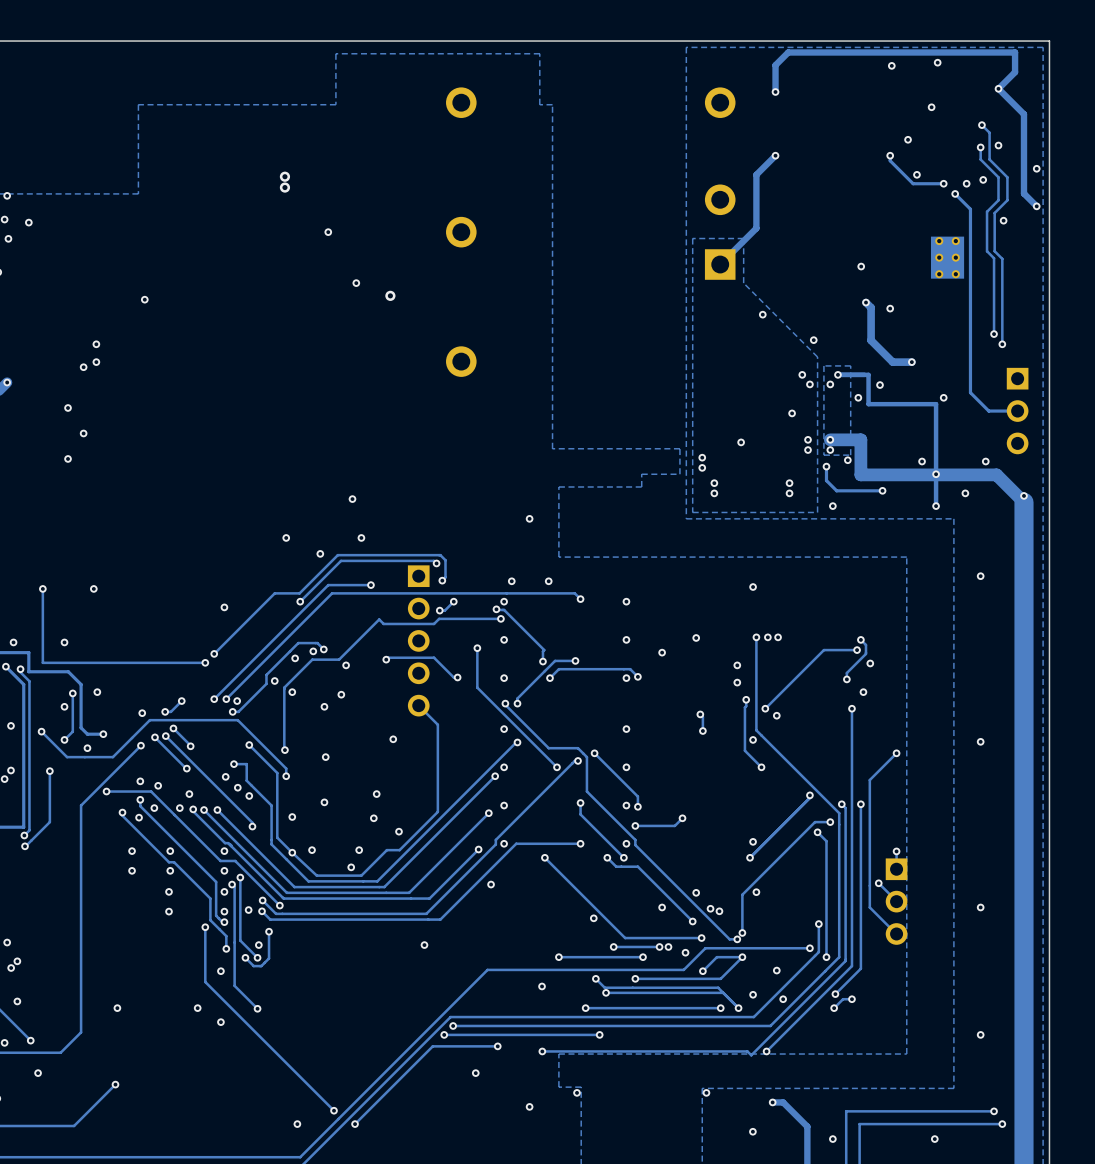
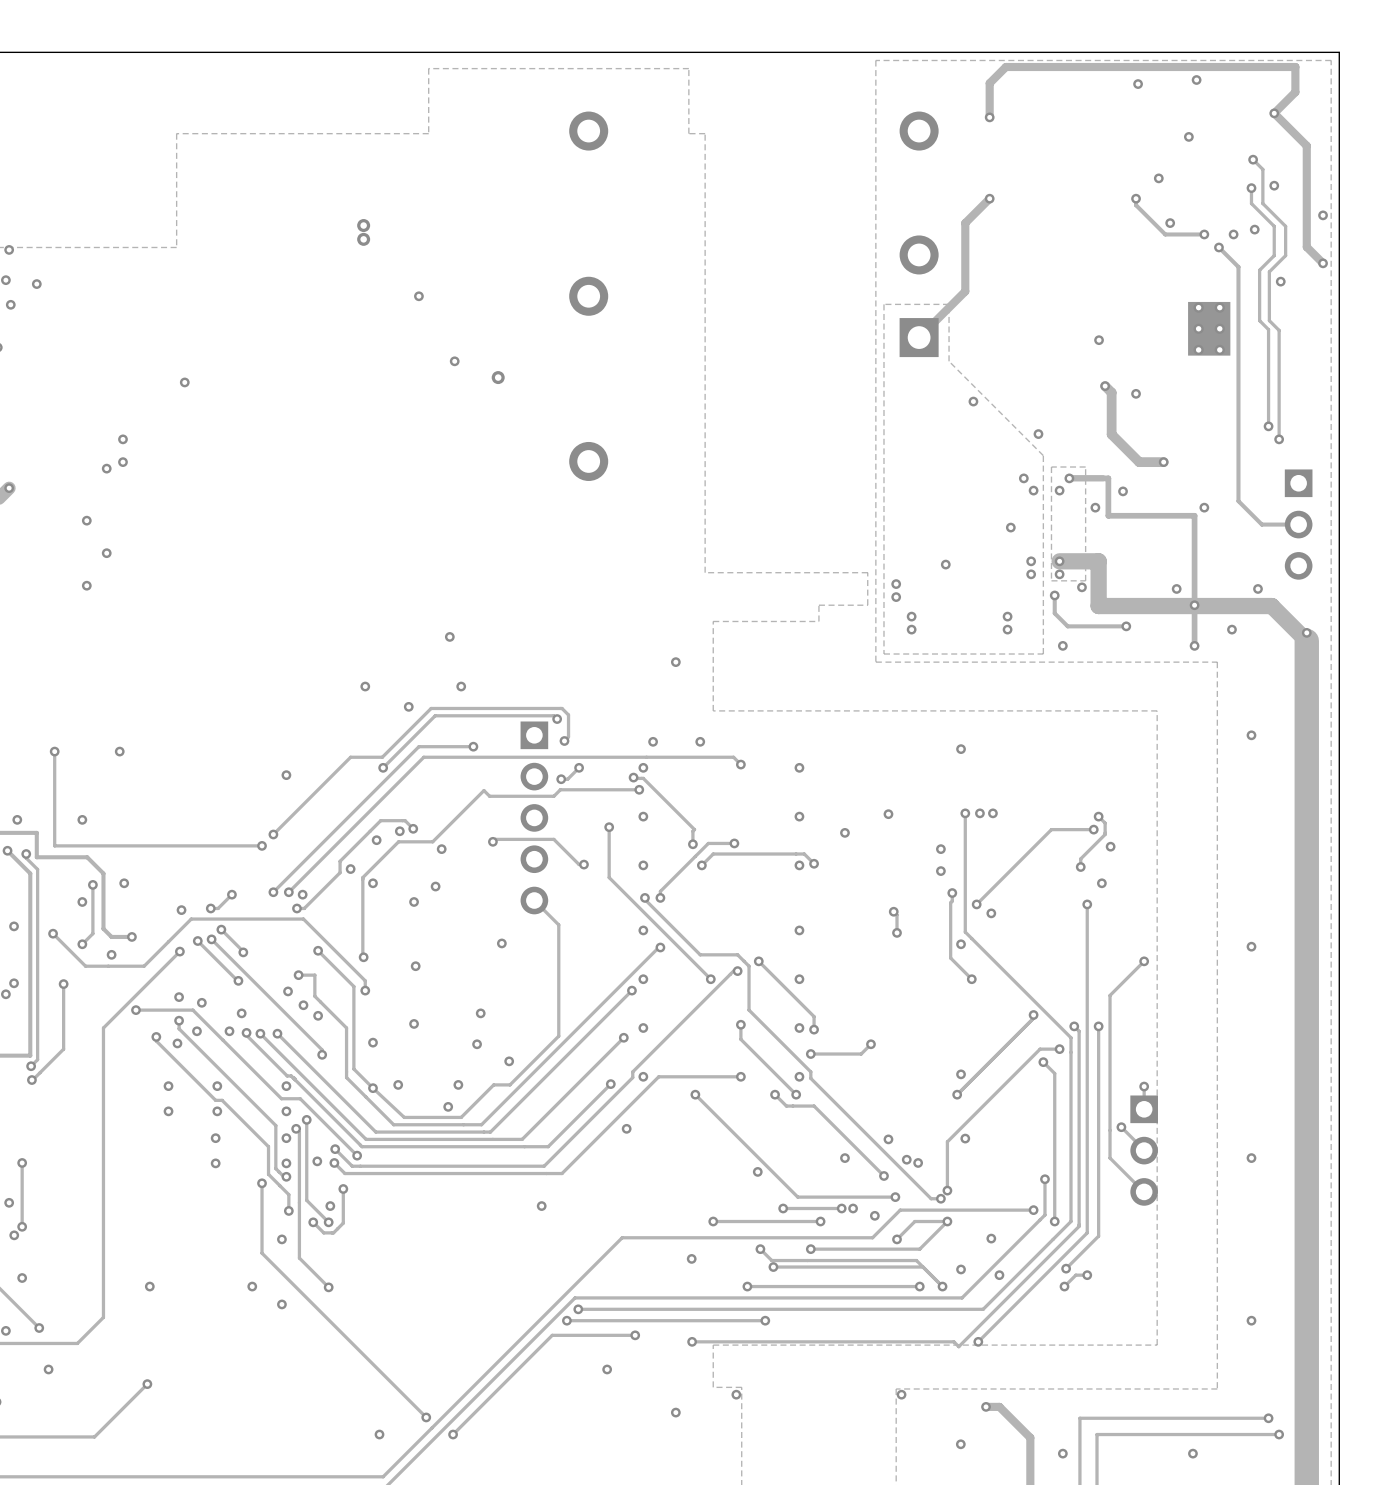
track: none -> (22, 1162) (22, 1223)
via: none -> (22, 1162)

